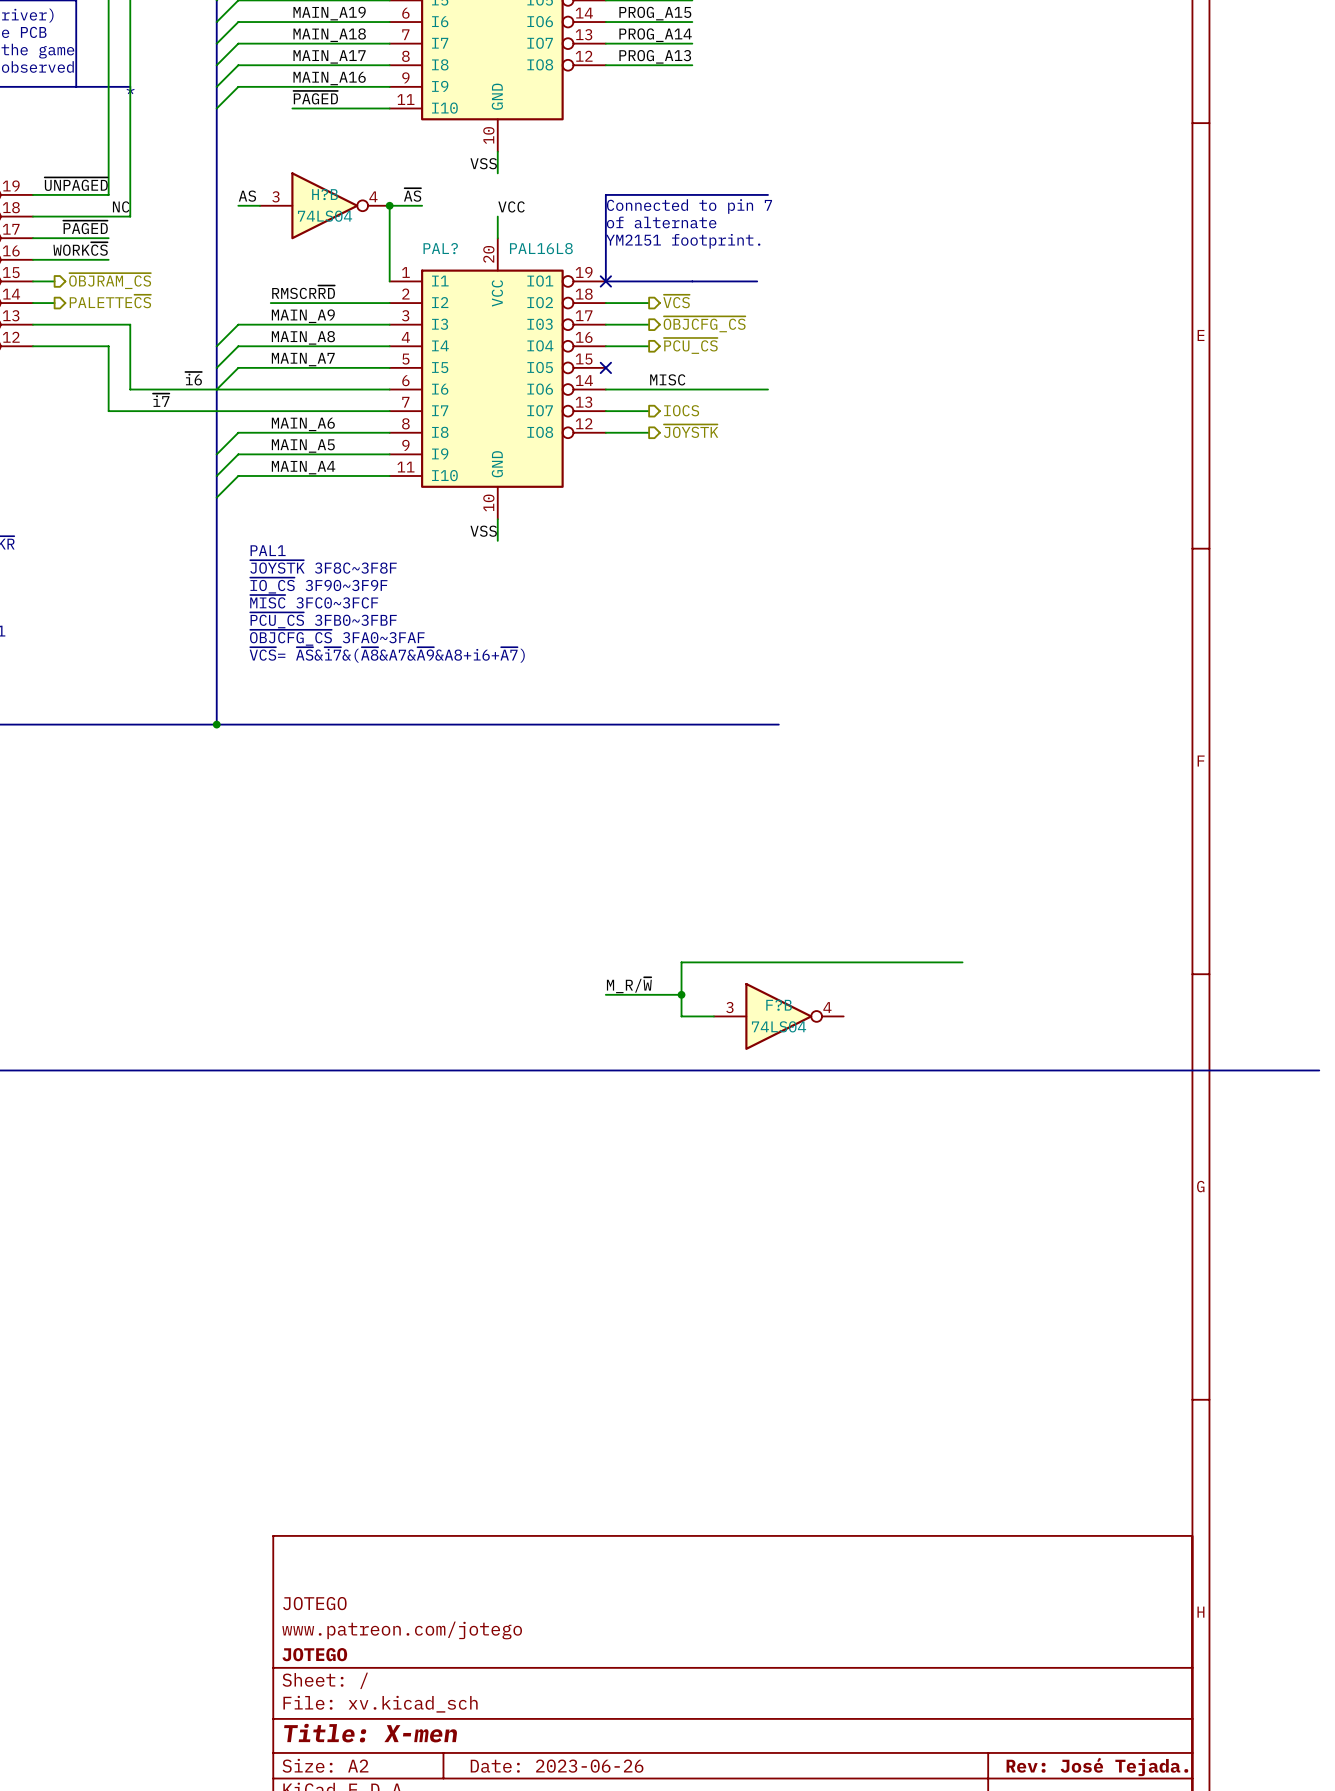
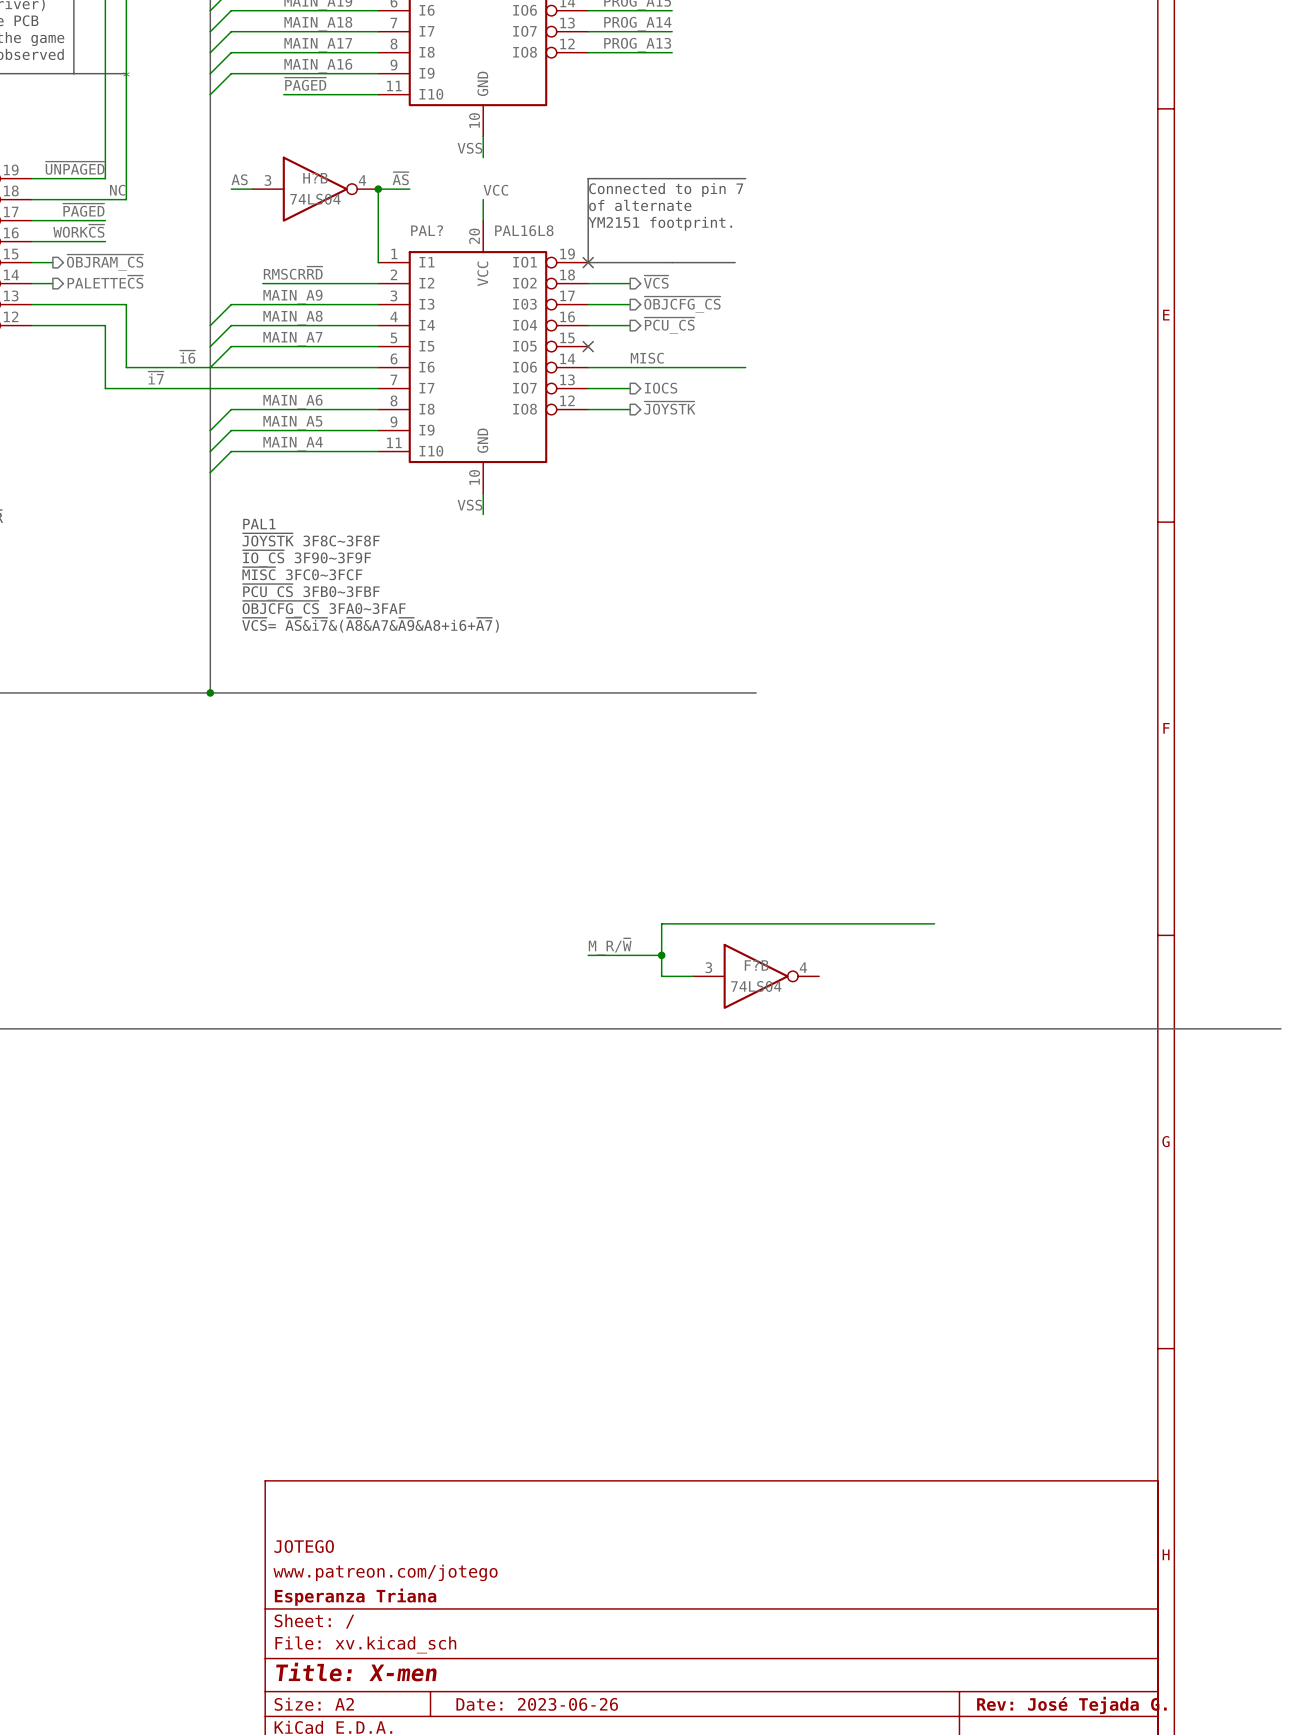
title block: JOTEGO (314, 1654) -> Esperanza Triana (355, 1597)
title block: Rev: José Tejada. (1097, 1766) -> Rev: José Tejada G. (1071, 1705)

